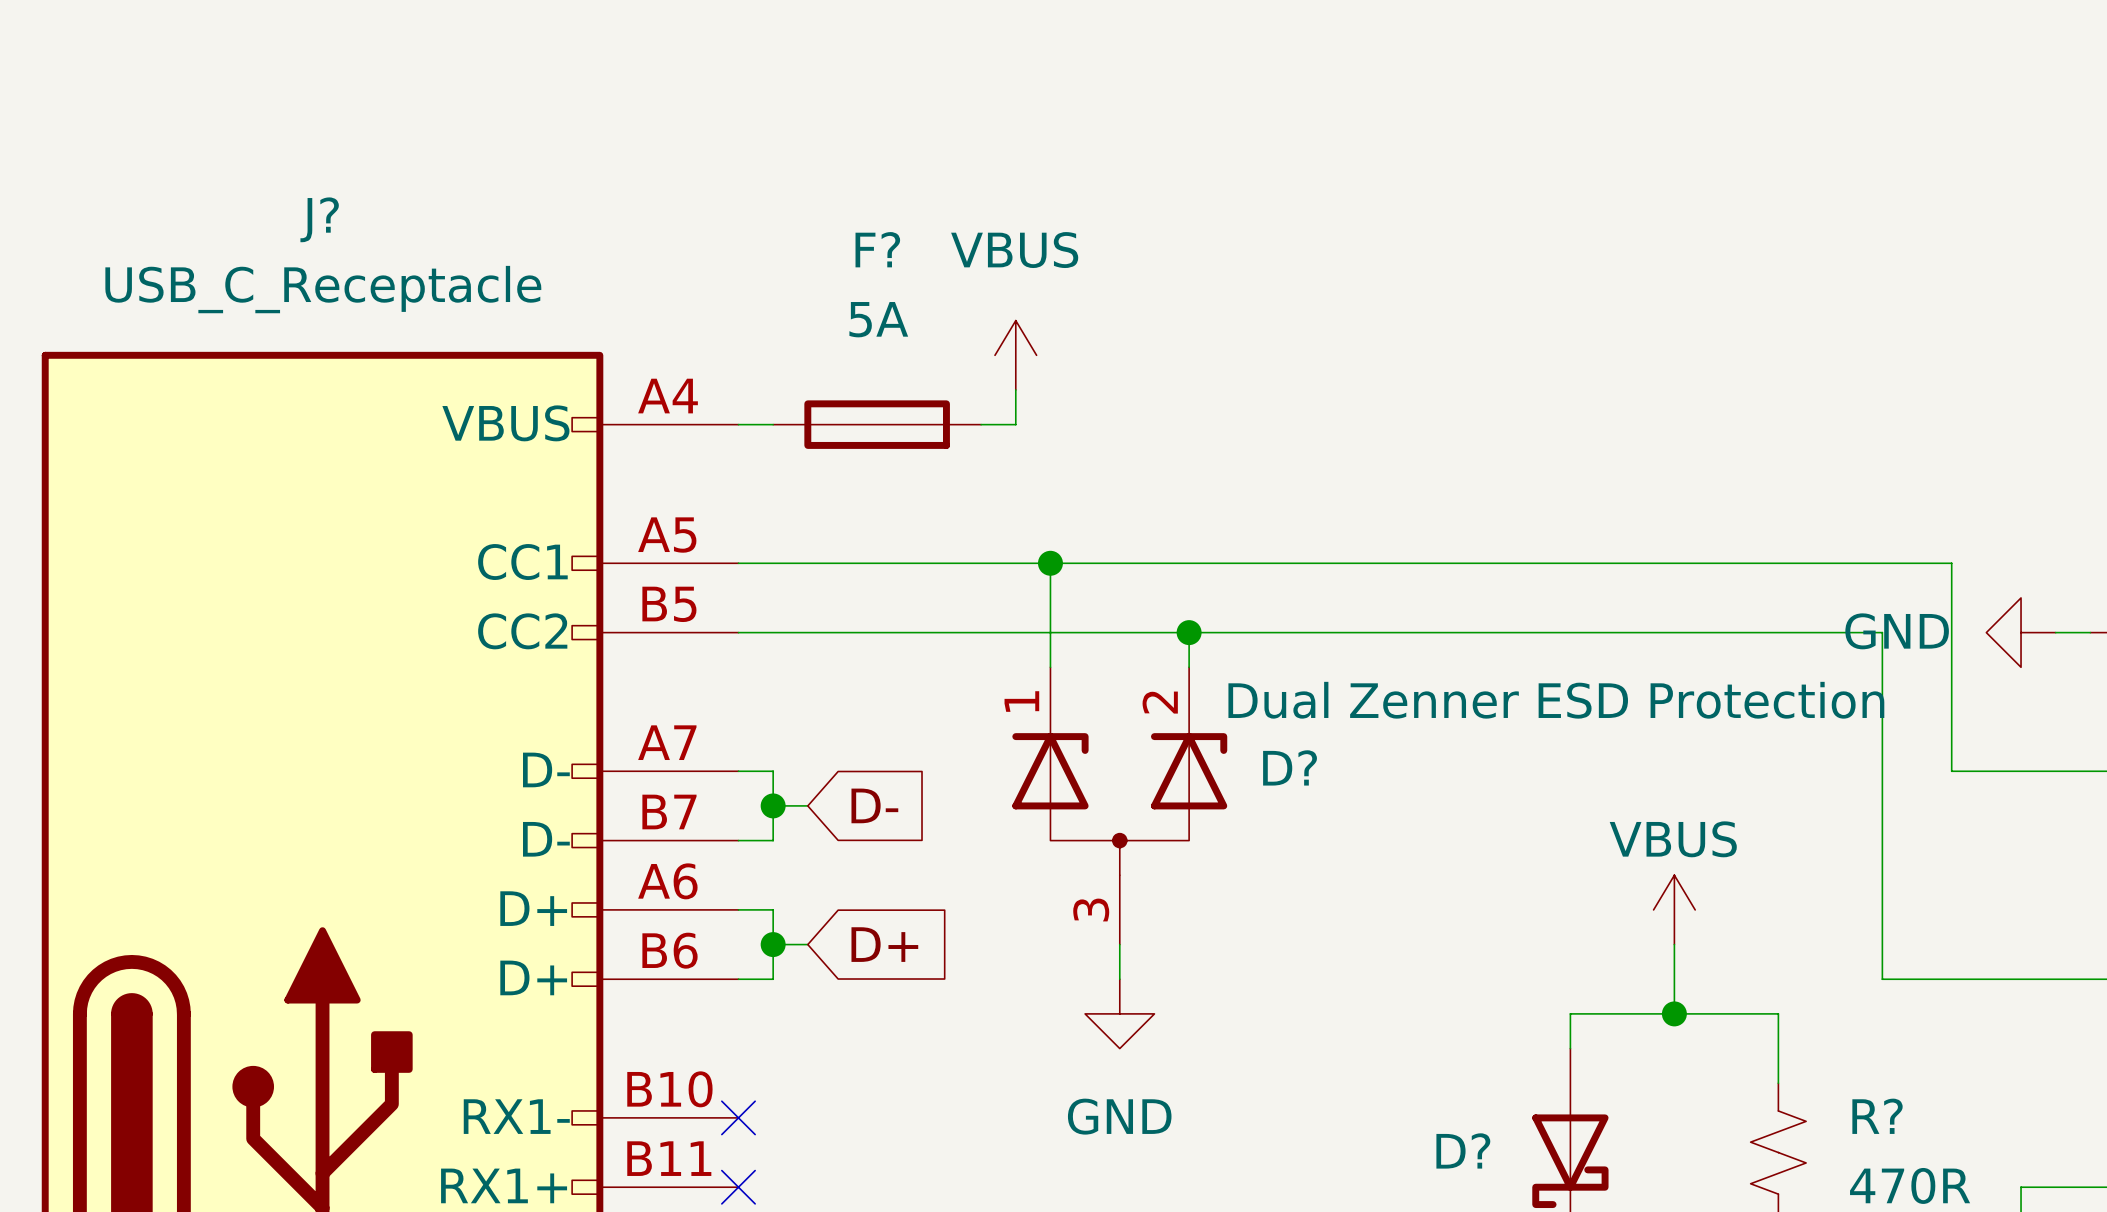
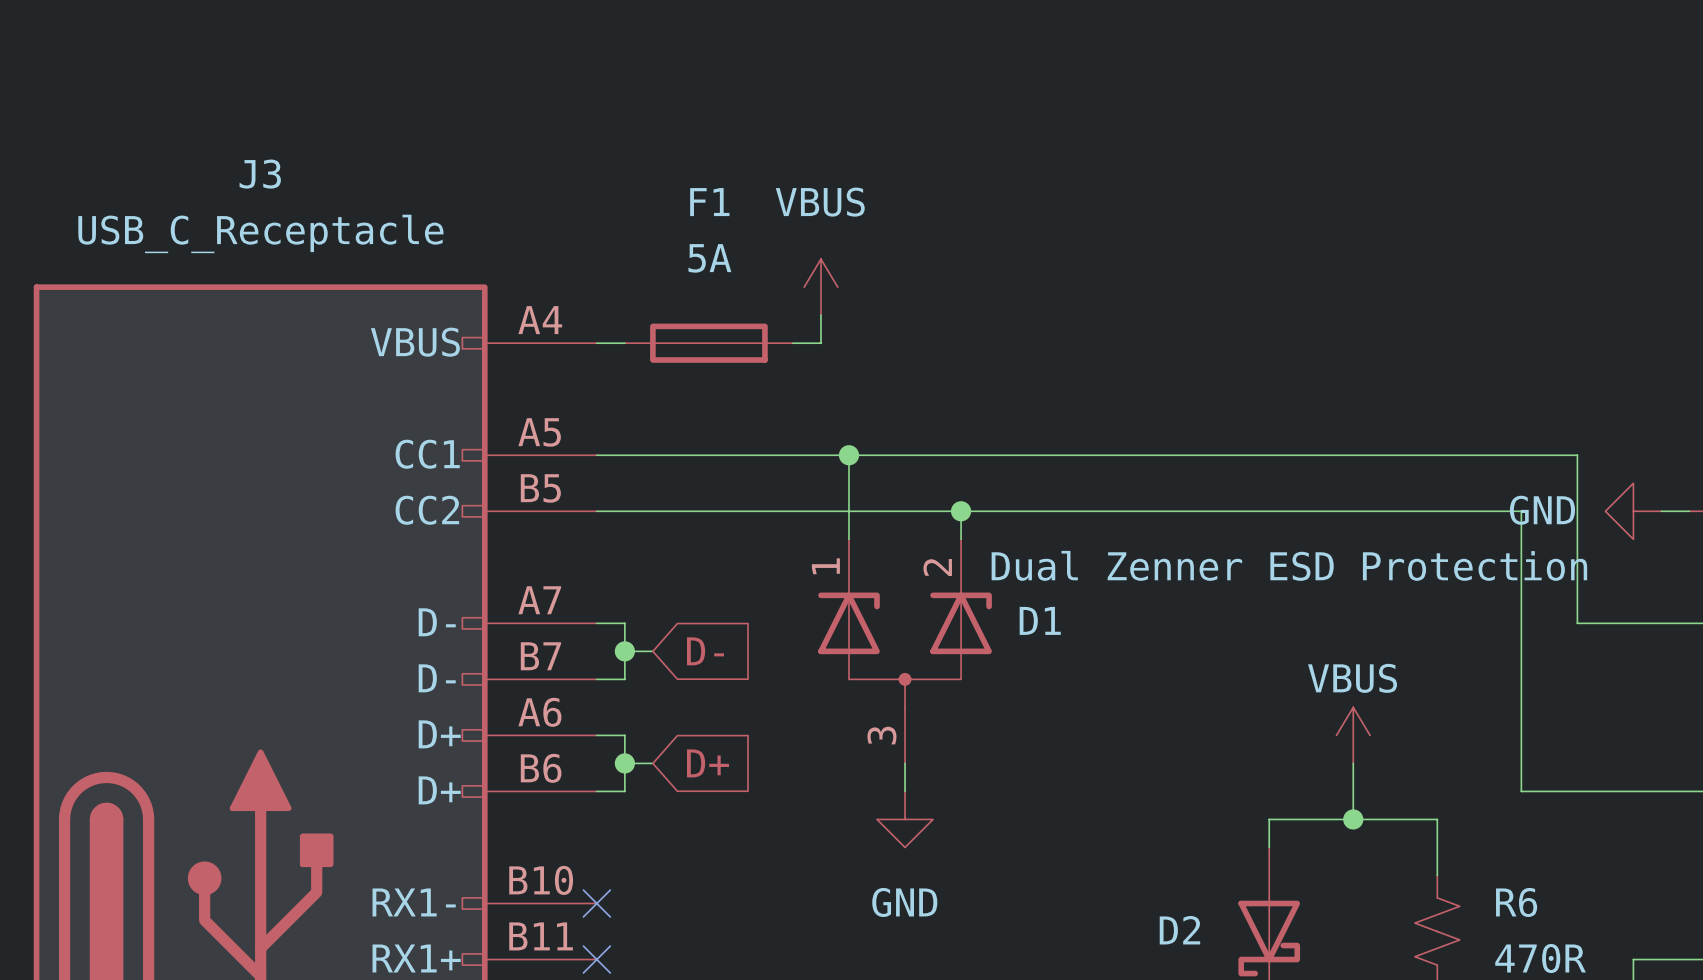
J? name: J? (319, 219) -> J3 (260, 174)
F? name: F? (877, 249) -> F1 (709, 202)
D? name: D? (1290, 767) -> D1 (1040, 620)
R? name: R? (1877, 1116) -> R6 (1516, 902)
D? name: D? (1463, 1150) -> D2 (1179, 930)

